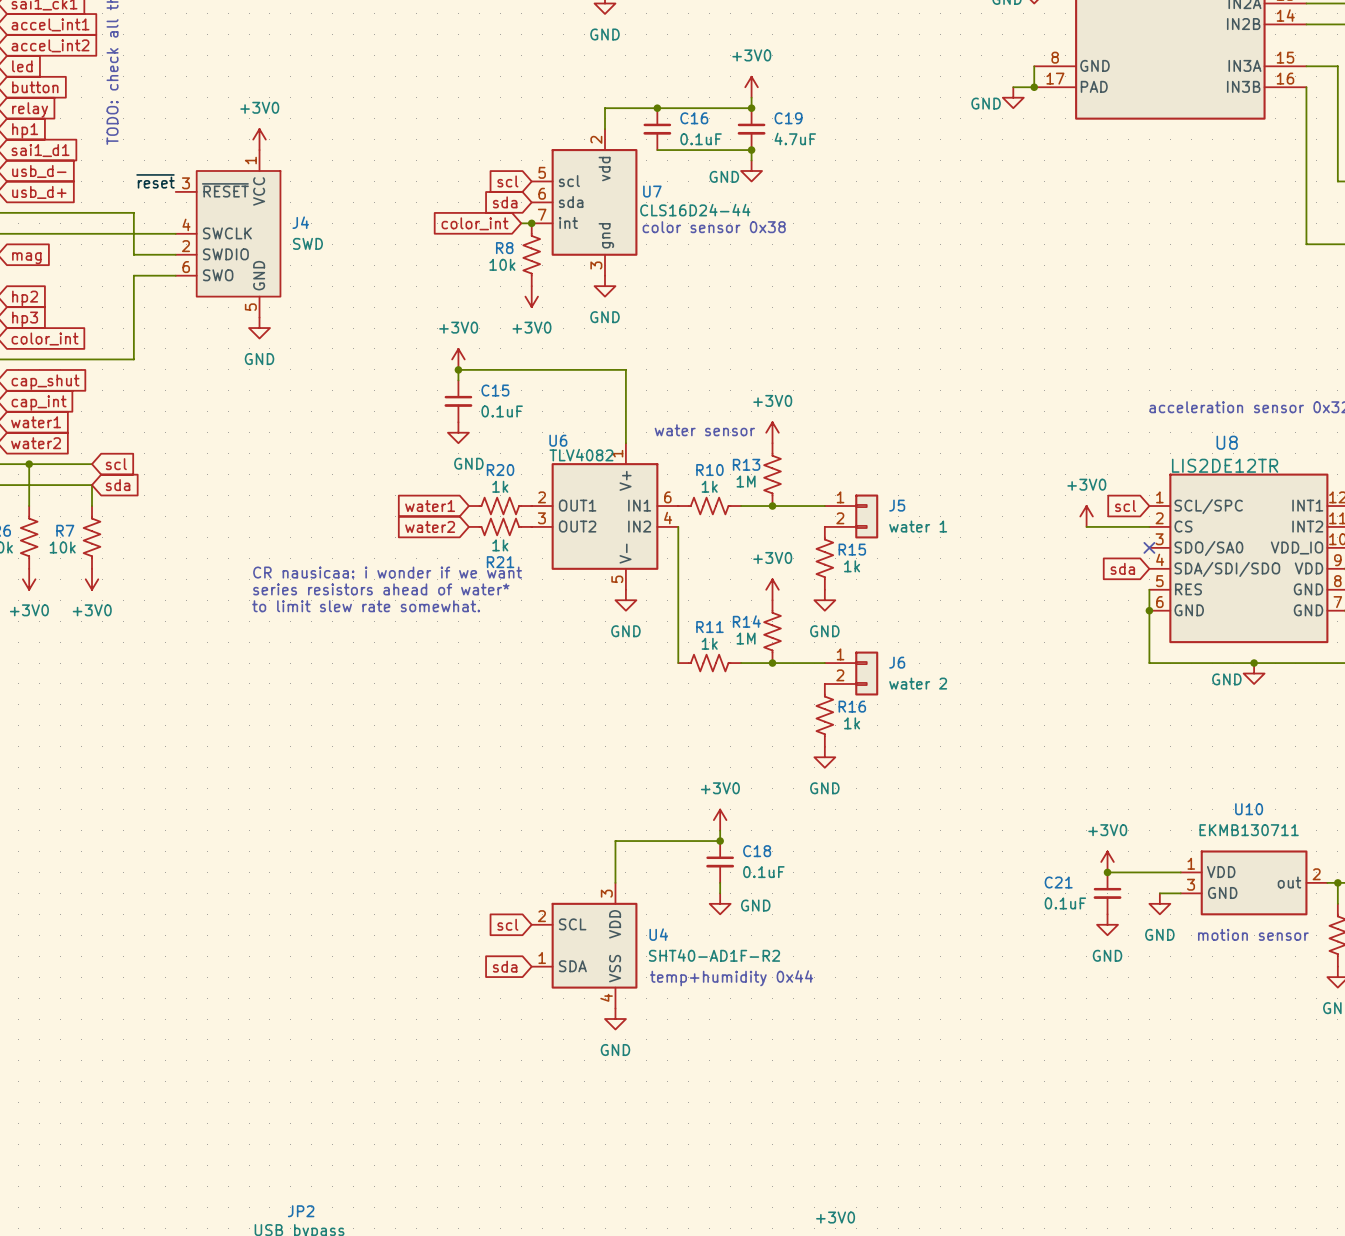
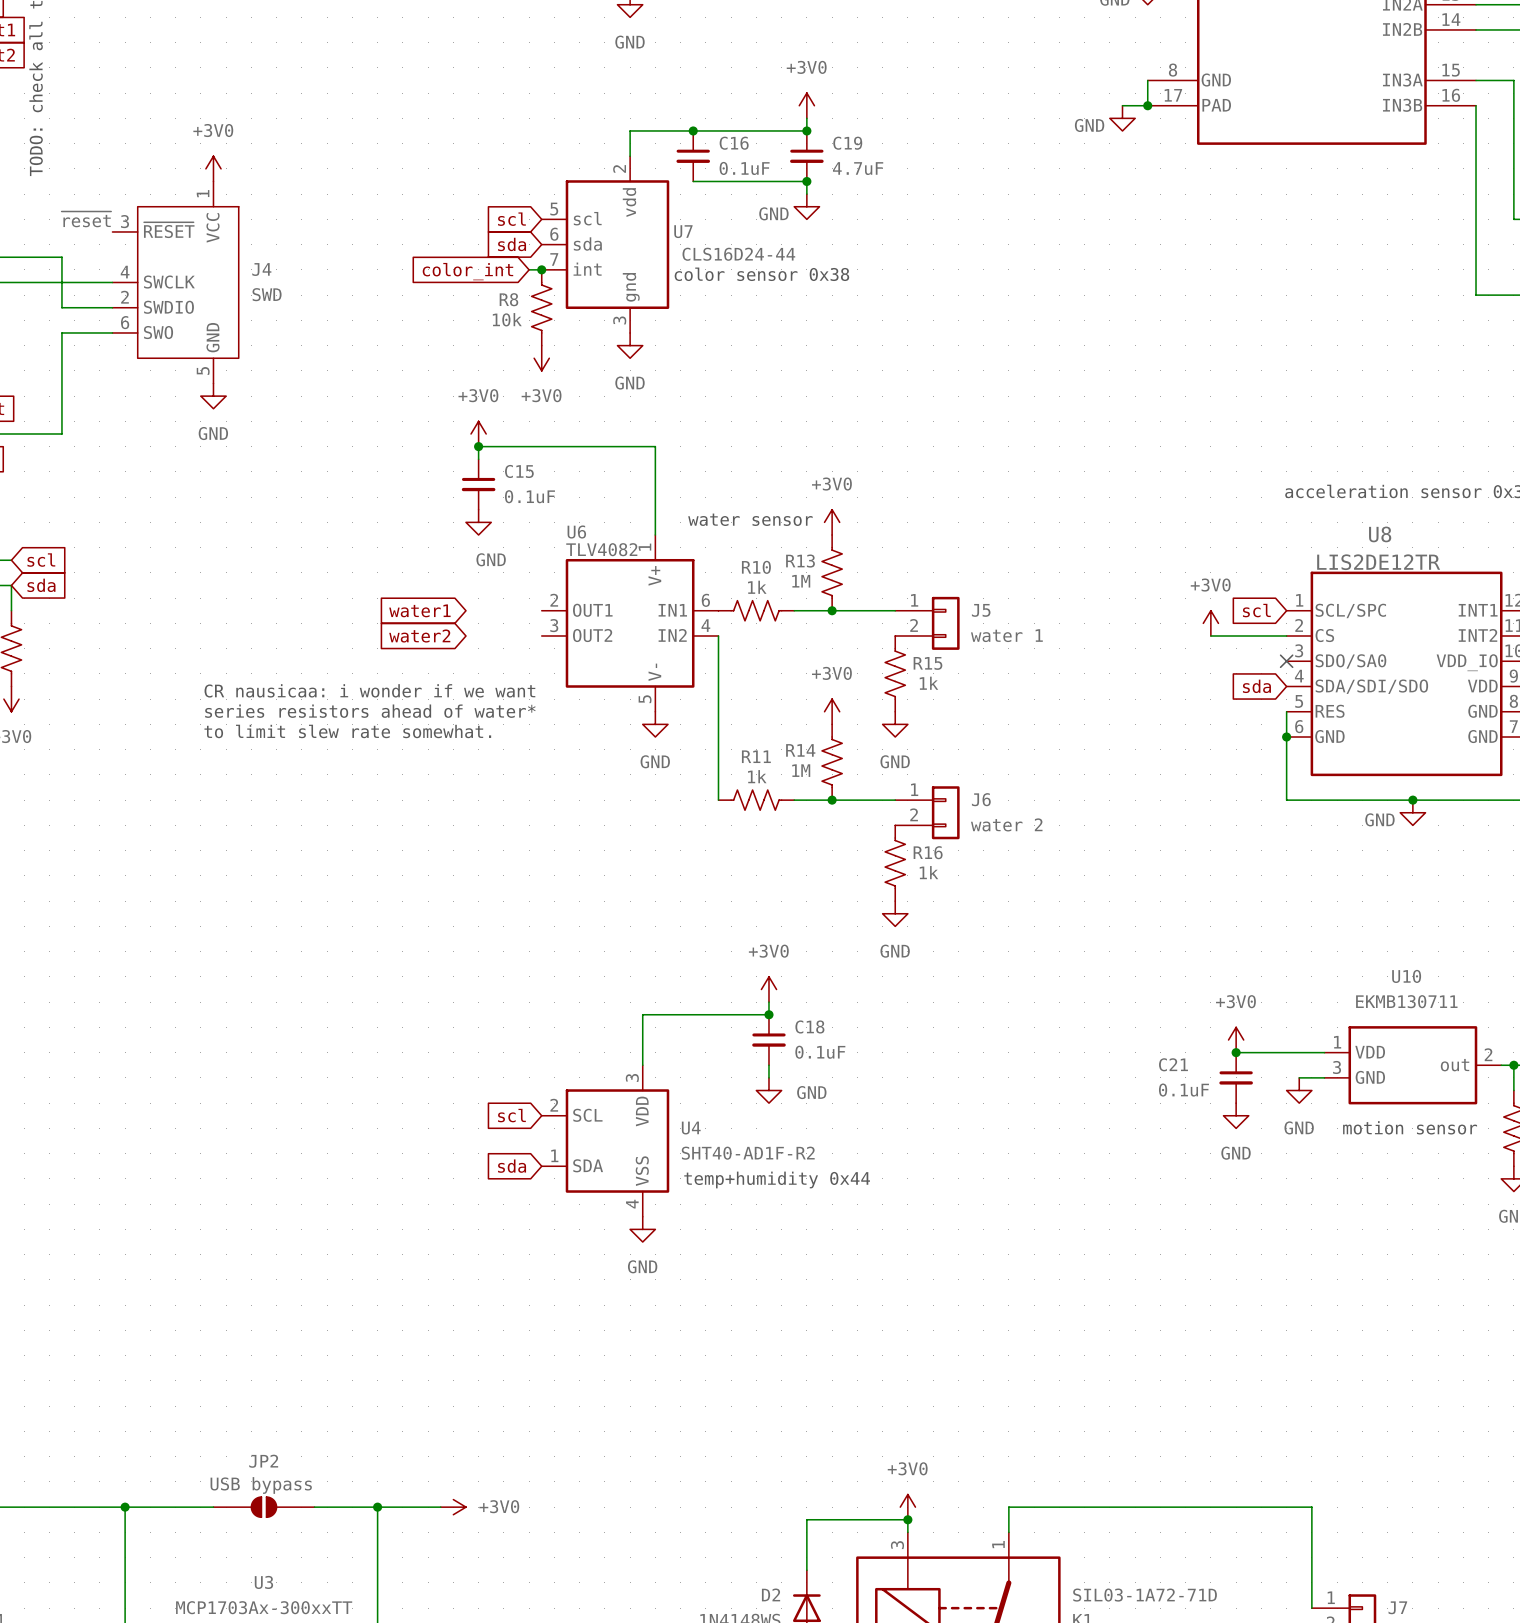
power symbol position: +3V0 (458, 359) -> +3V0 (478, 433)
junction position: (458, 369) -> (478, 446)
wire: (479, 369) (458, 369) (458, 380) -> (478, 446) (478, 459)
C15 position: (458, 401) -> (478, 484)
power symbol position: GND (458, 432) -> GND (478, 522)
R20: 1k (500, 506) -> none
R21: 1k (500, 526) -> none

